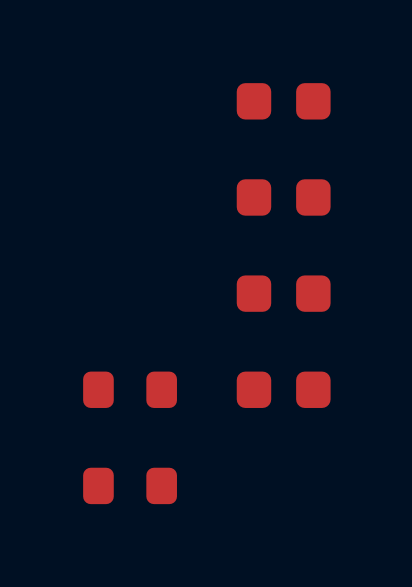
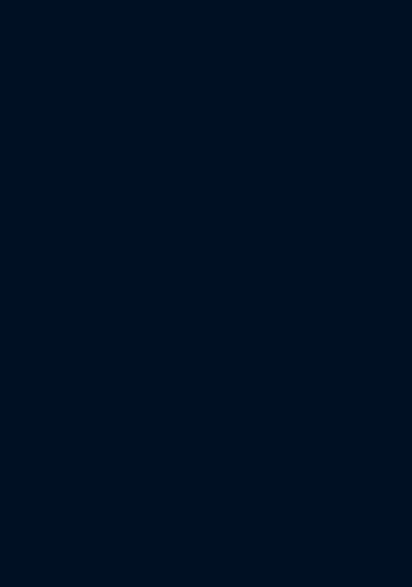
part: (283, 101) -> none
part: (283, 197) -> none
part: (283, 293) -> none
part: (130, 389) -> none
part: (283, 389) -> none
part: (130, 485) -> none

